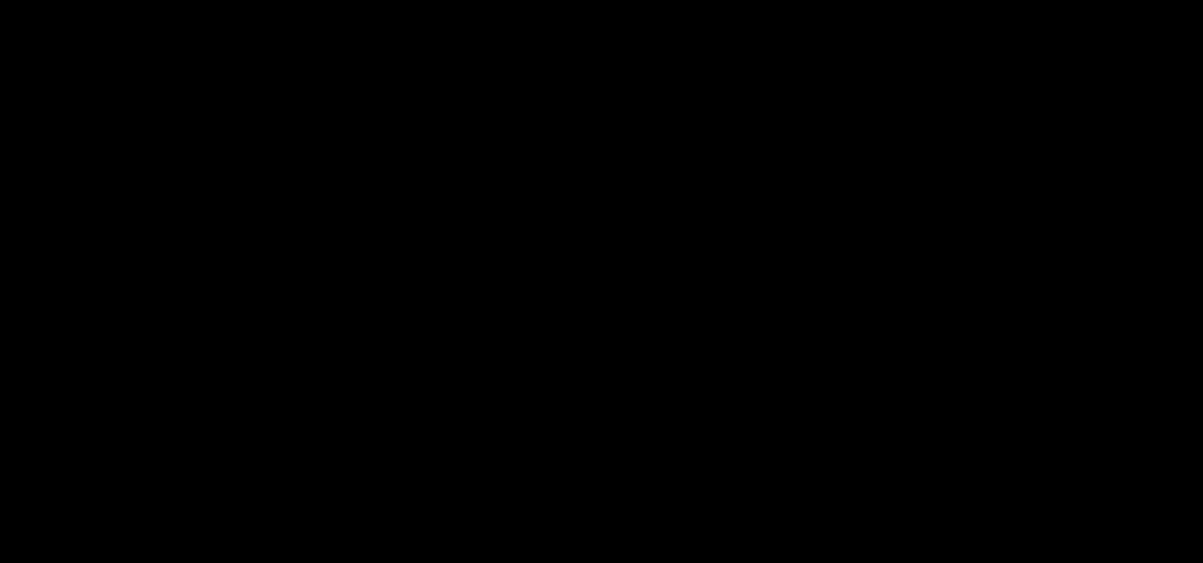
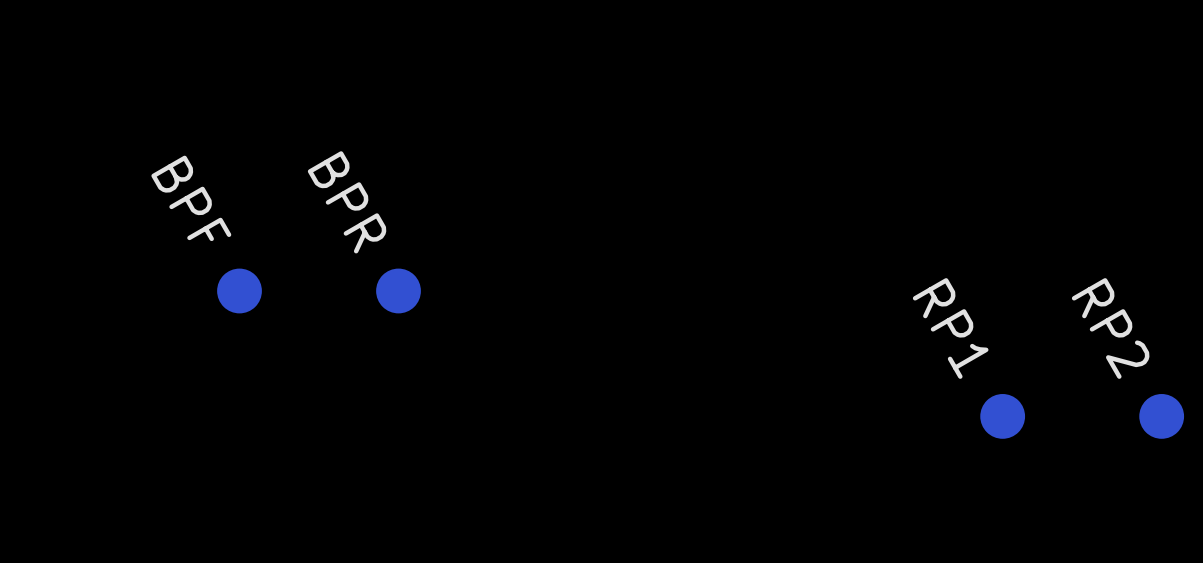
part: none -> BPF (239, 290)
part: none -> BPR (398, 290)
part: none -> RP1 (1002, 416)
part: none -> RP2 (1161, 416)

